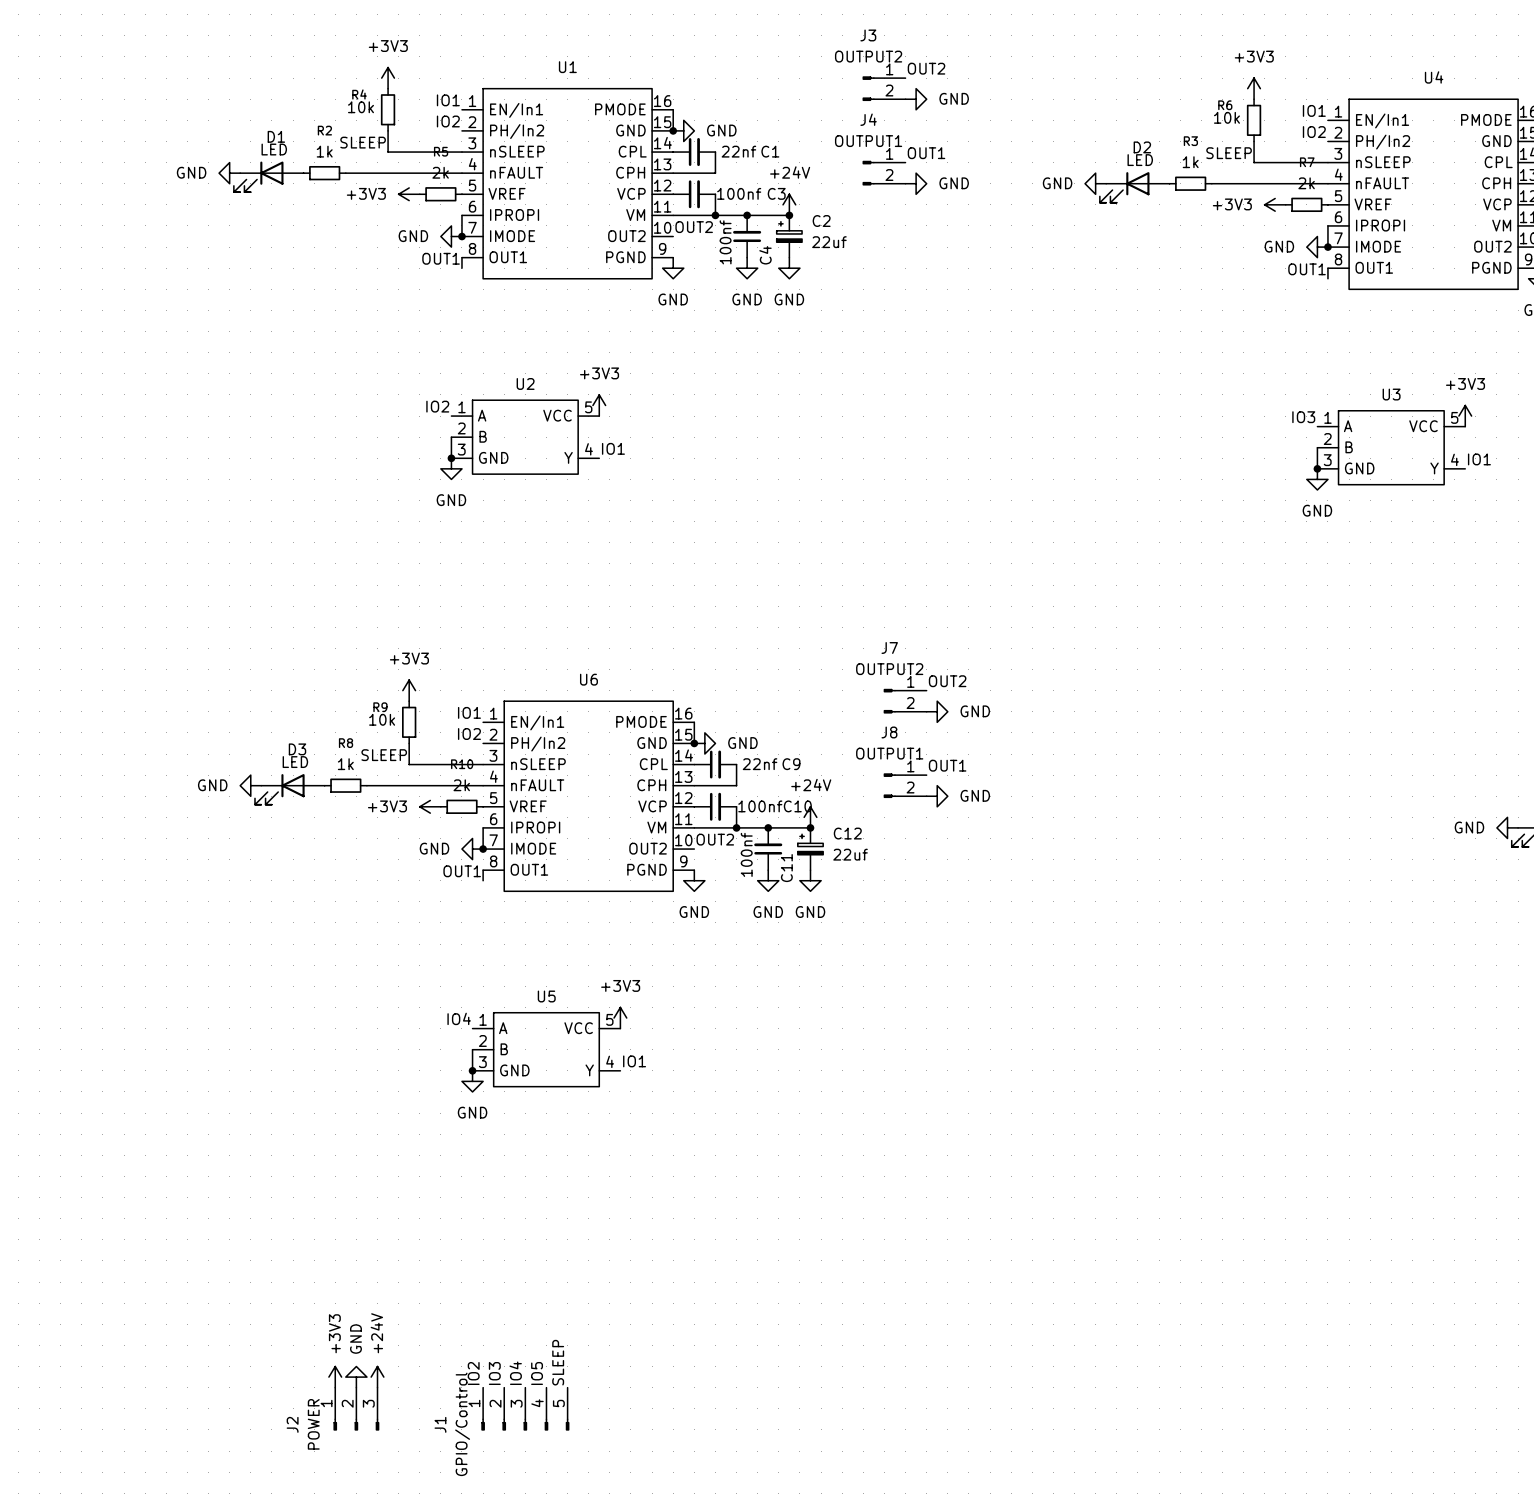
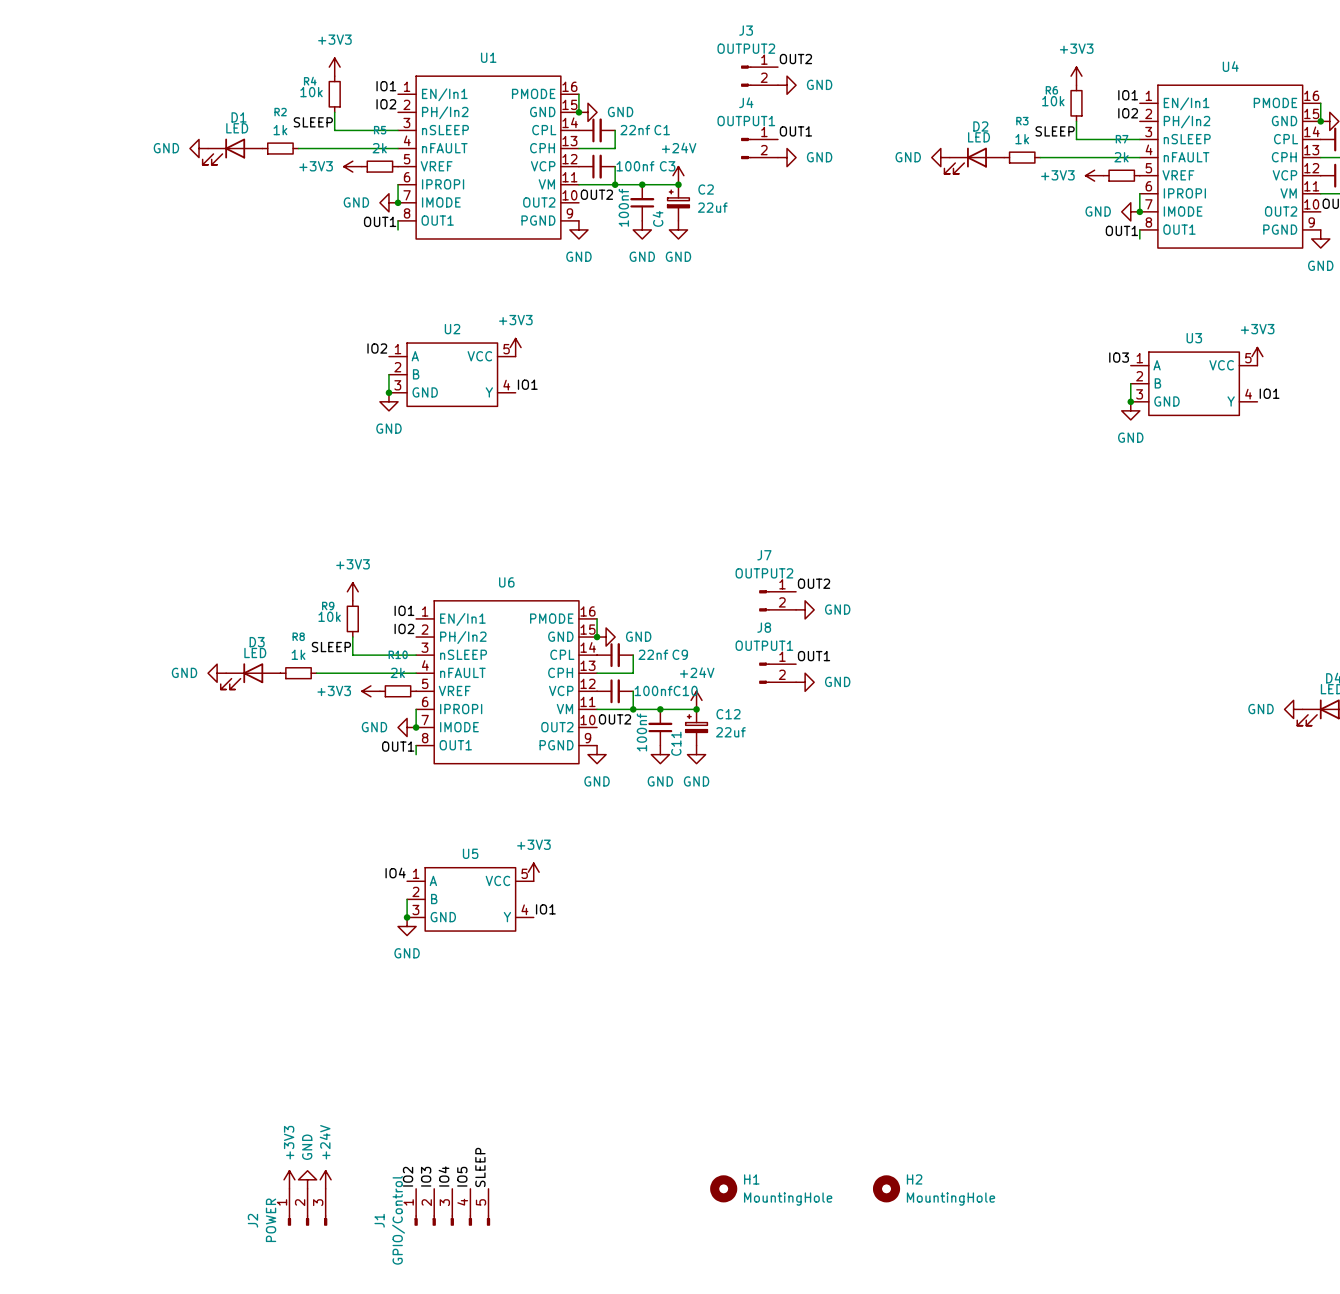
H1: none -> MountingHole (723, 1188)
H2: none -> MountingHole (886, 1188)

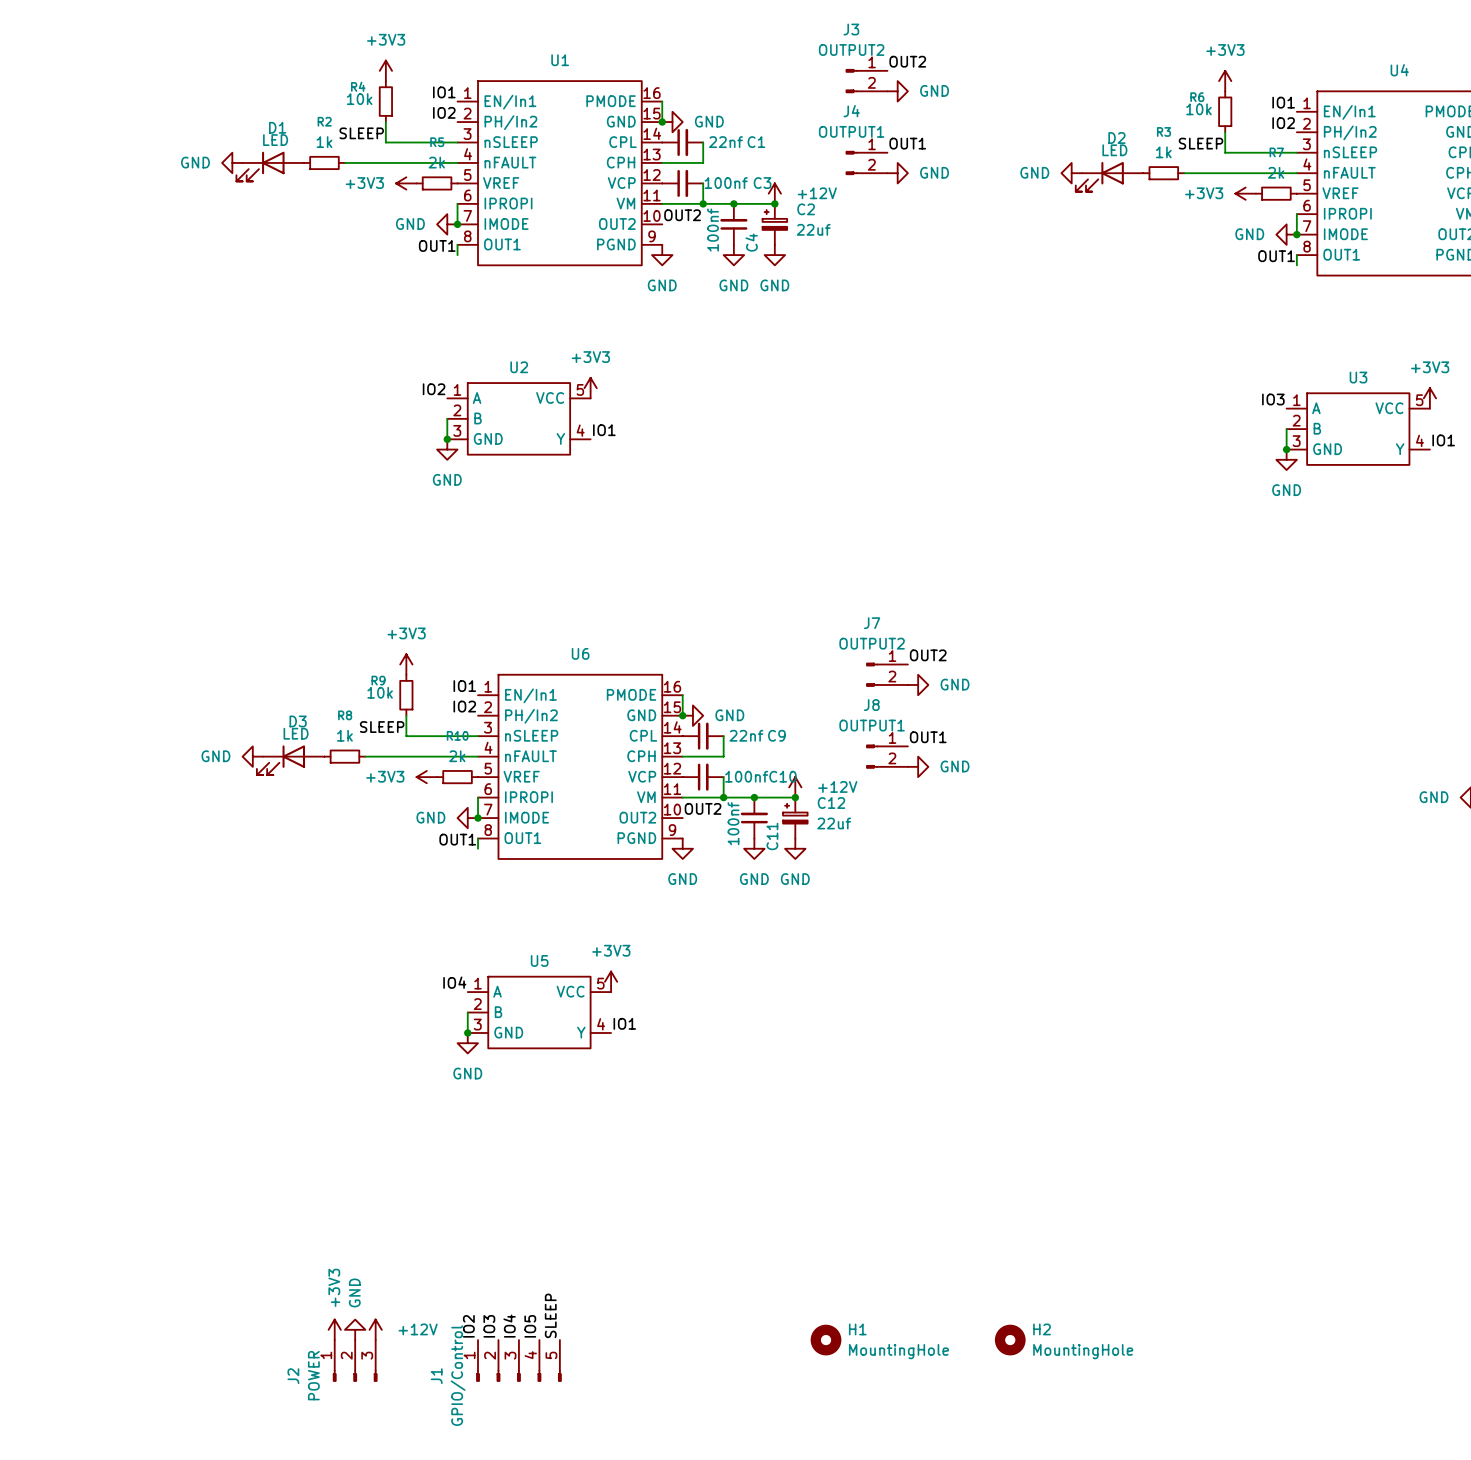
power symbol: +24V (678, 175) -> +12V (774, 193)
power symbol: +24V (696, 700) -> +12V (795, 787)
power symbol: +24V (325, 1179) -> +12V (375, 1329)

